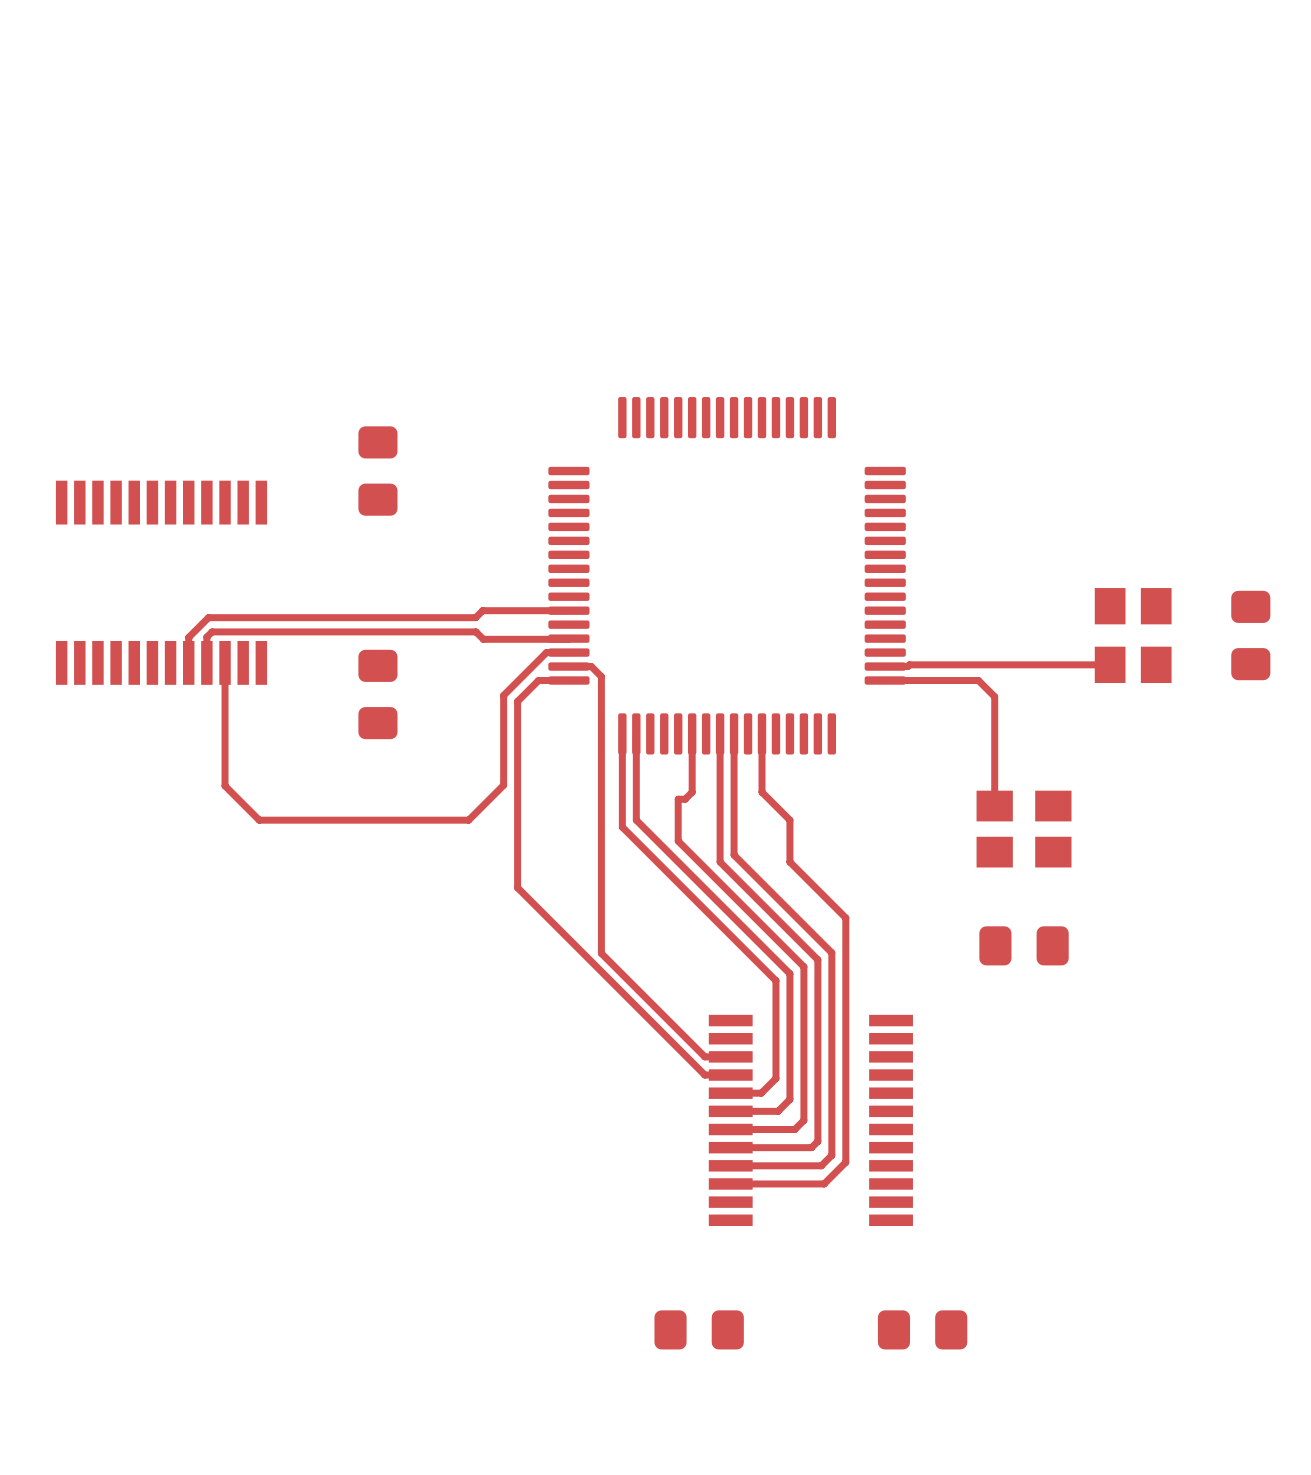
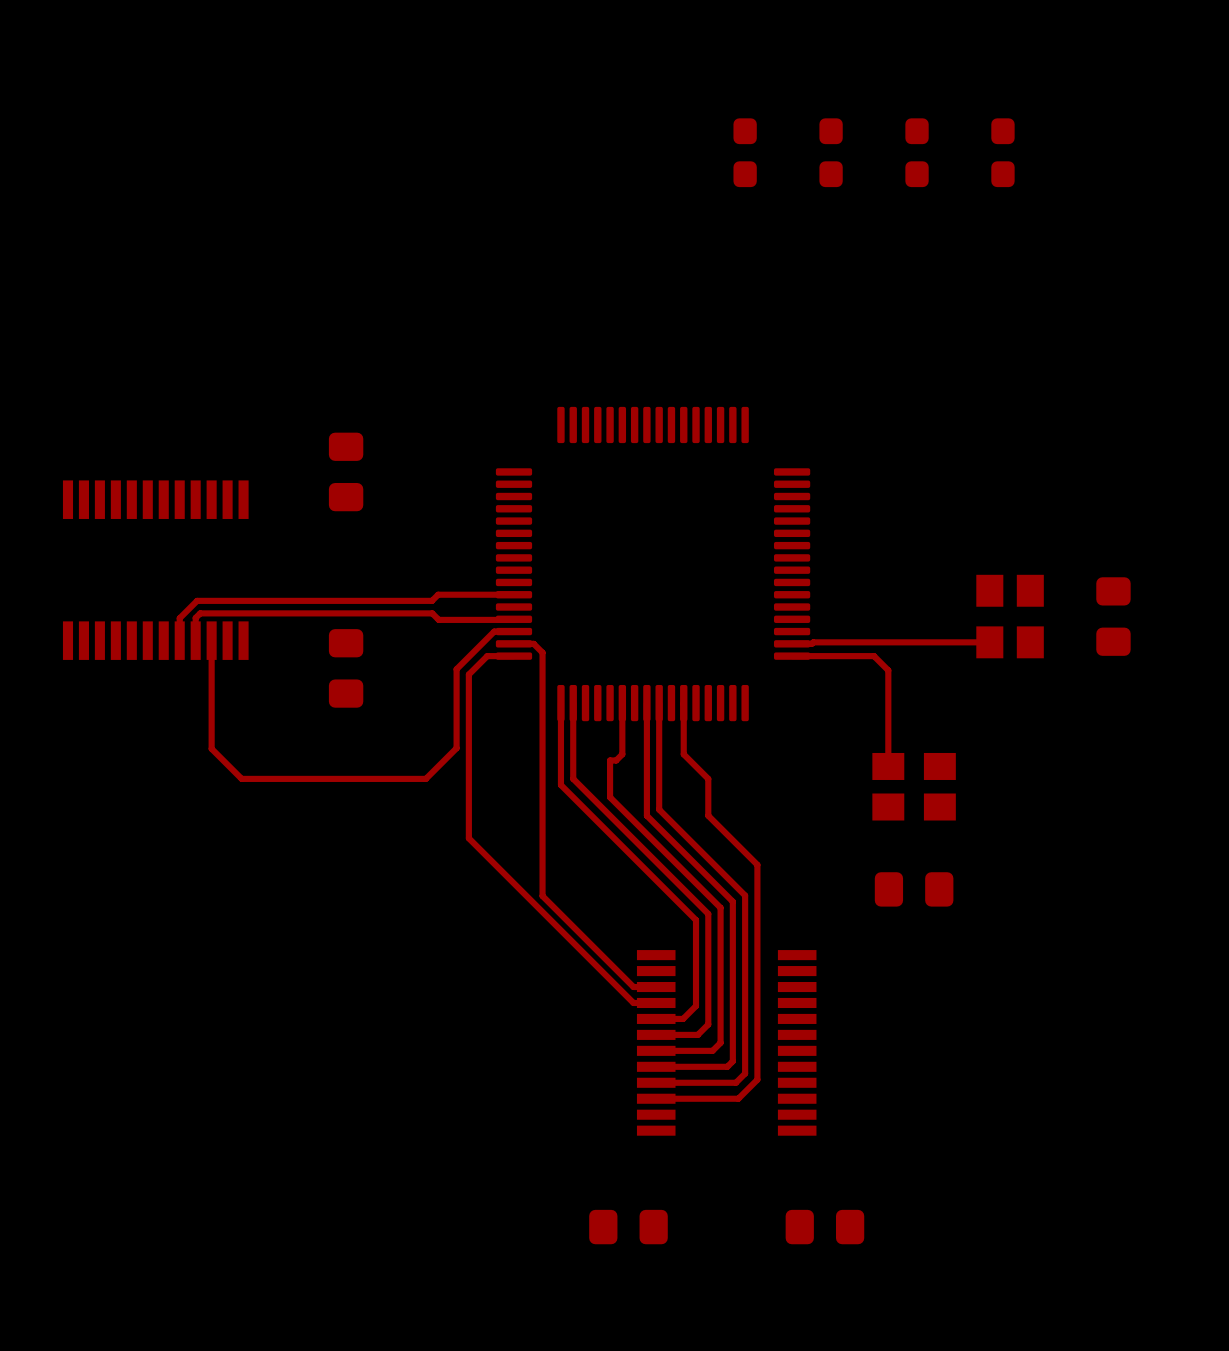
part: none -> (745, 152)
part: none -> (831, 152)
part: none -> (917, 152)
part: none -> (1002, 152)

